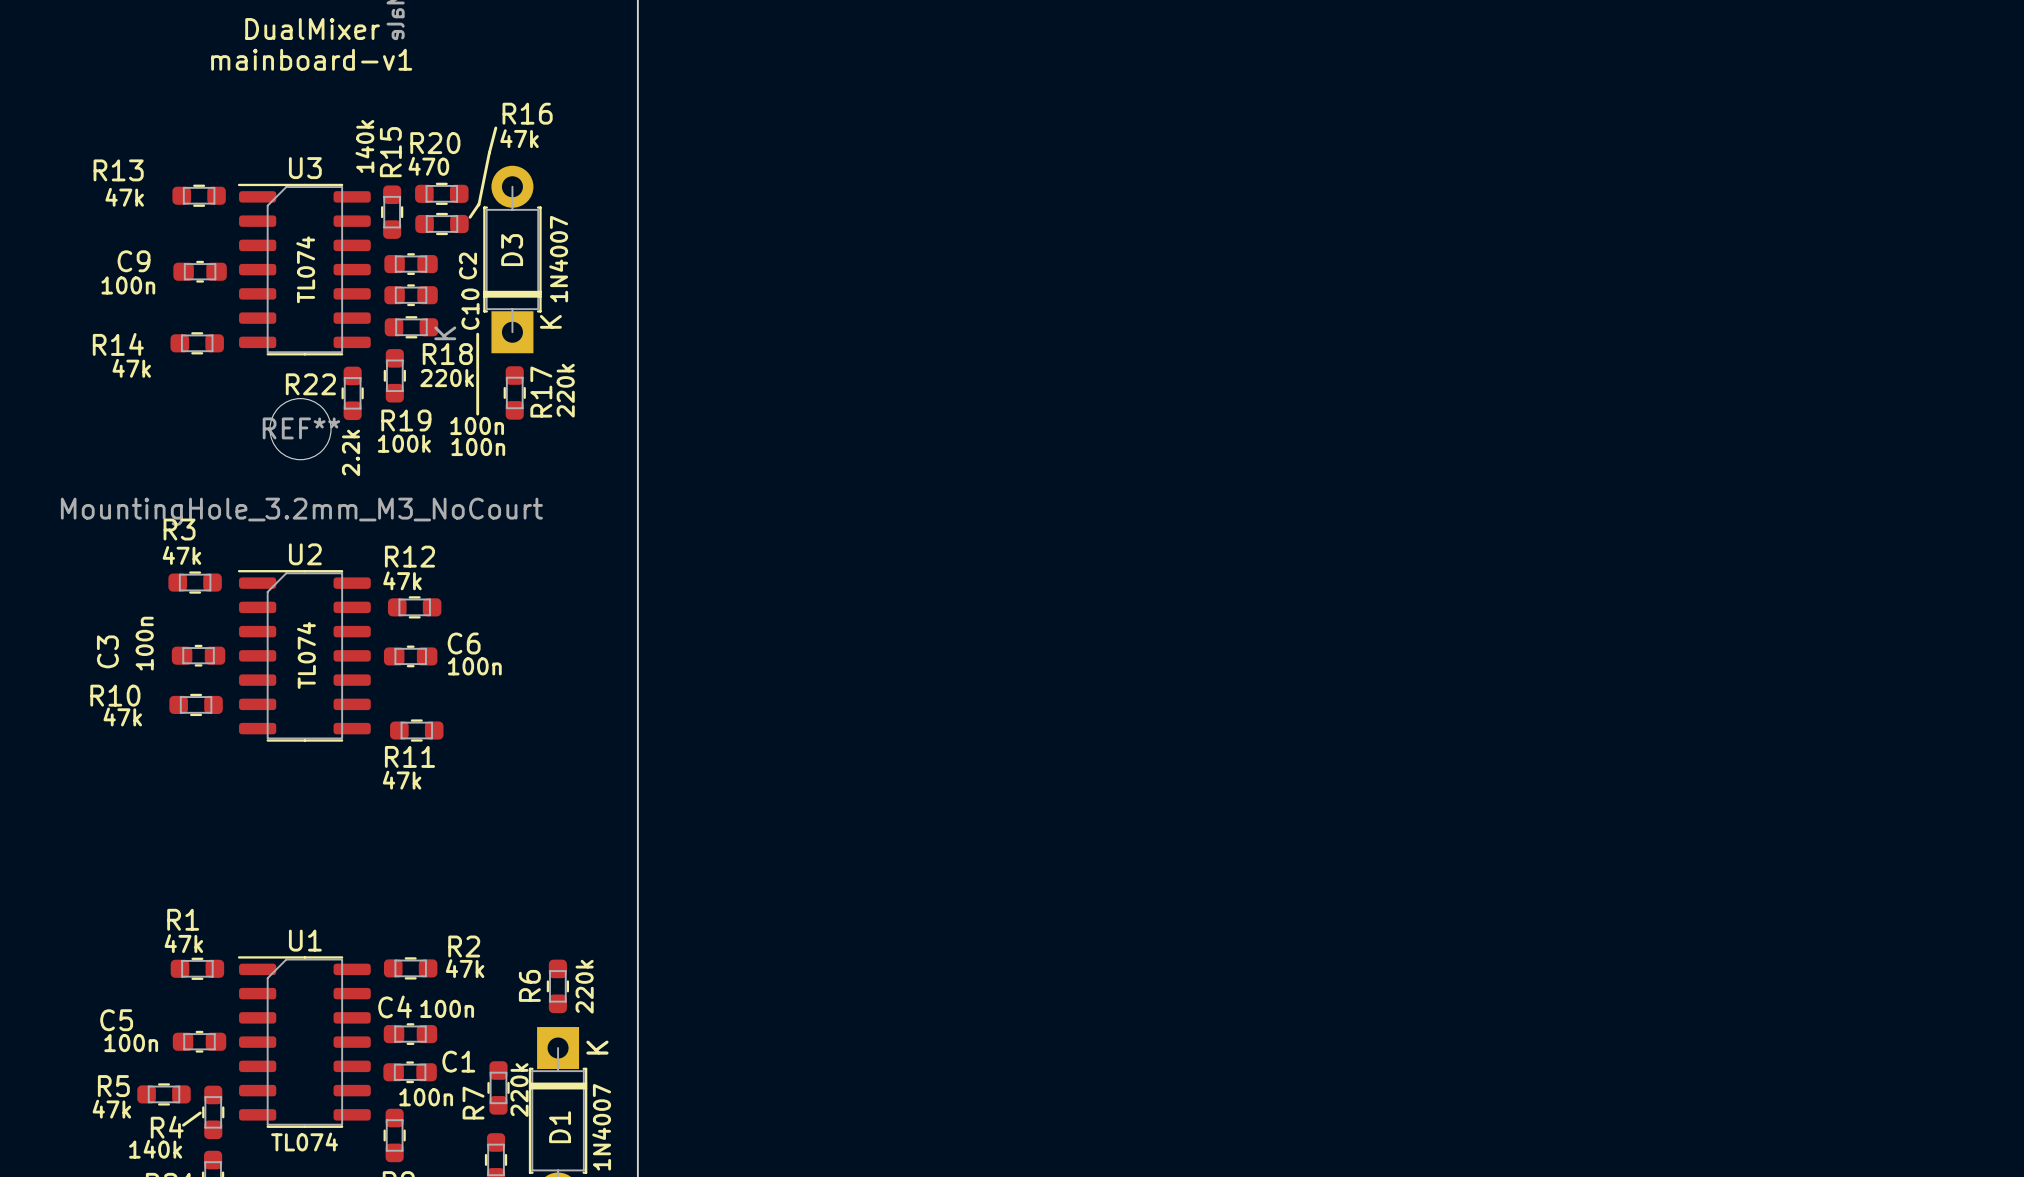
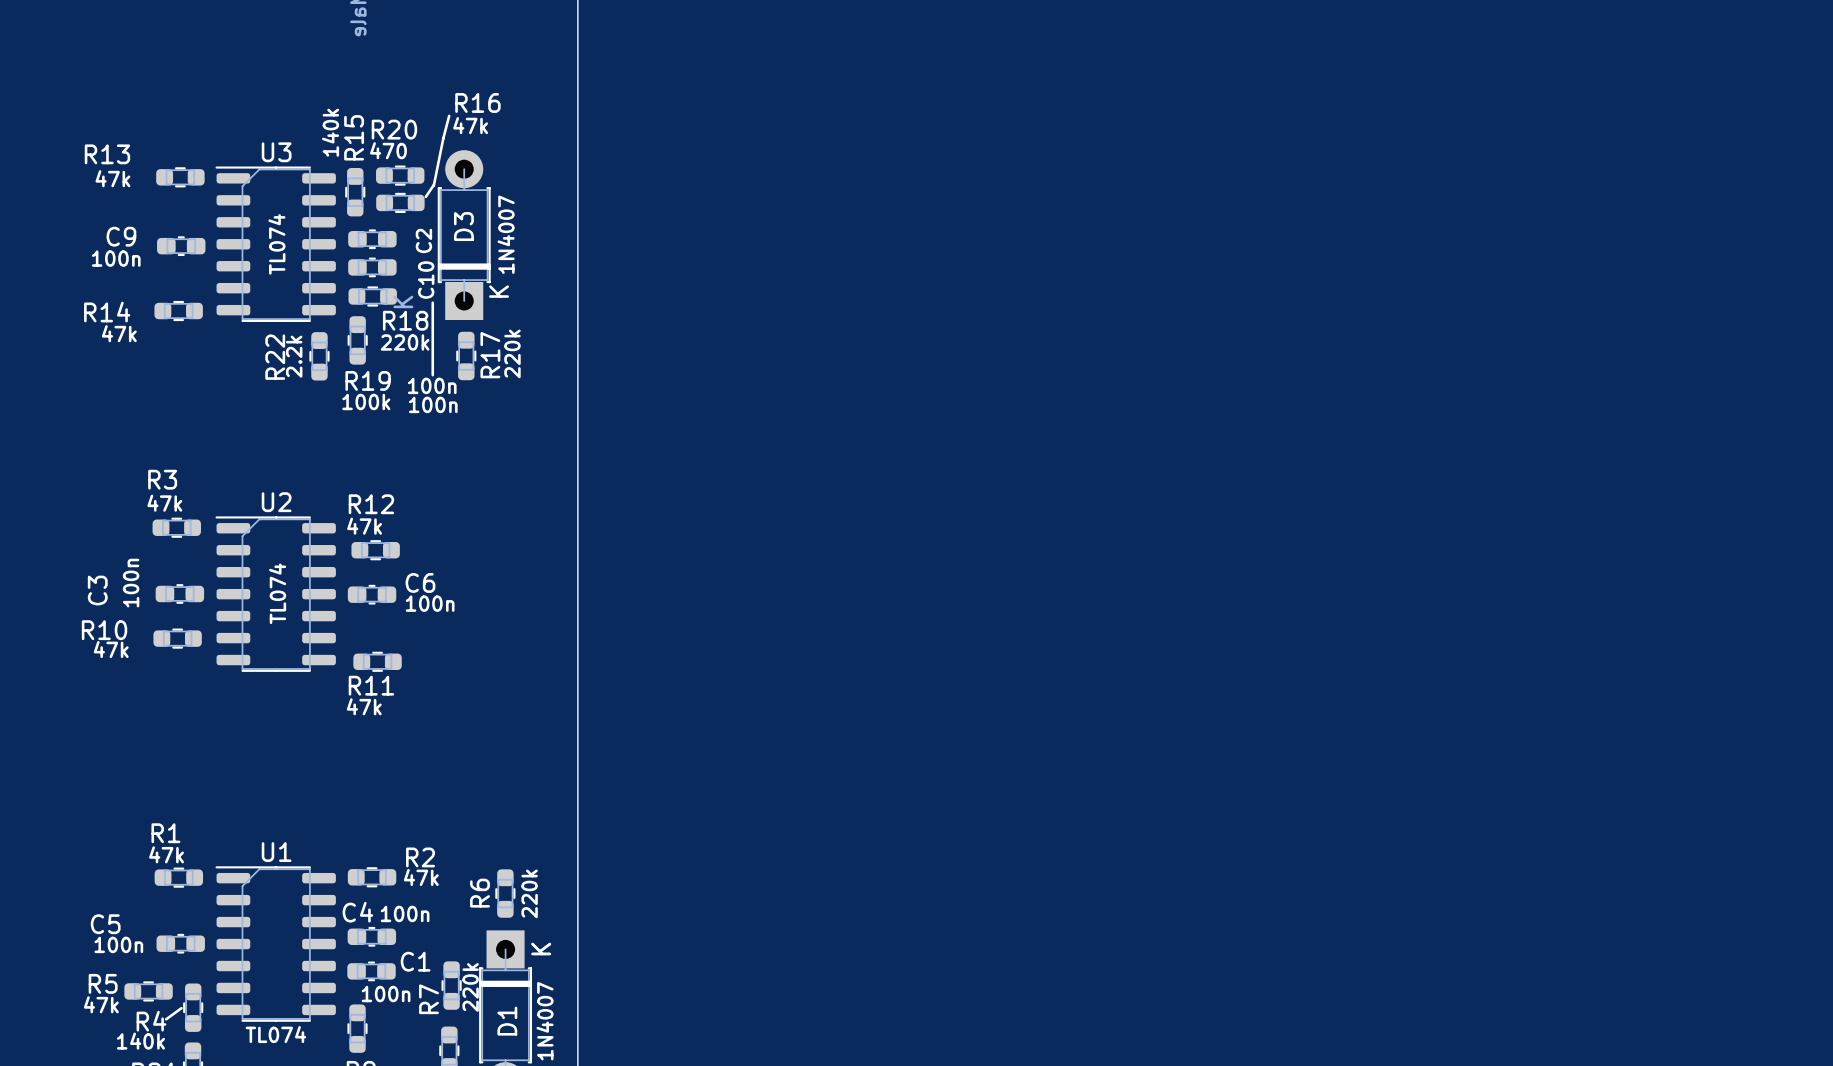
text: DualMixer (312, 29) -> none
text: mainboard-v1 (311, 59) -> none
R22 name rotation: 0° (310, 384) -> 90° counterclockwise (275, 357)
REF**: MountingHole_3.2mm_M3_NoCourt (300, 429) -> none
R22 value position: 2.2k (351, 452) -> 2.2k (294, 356)

